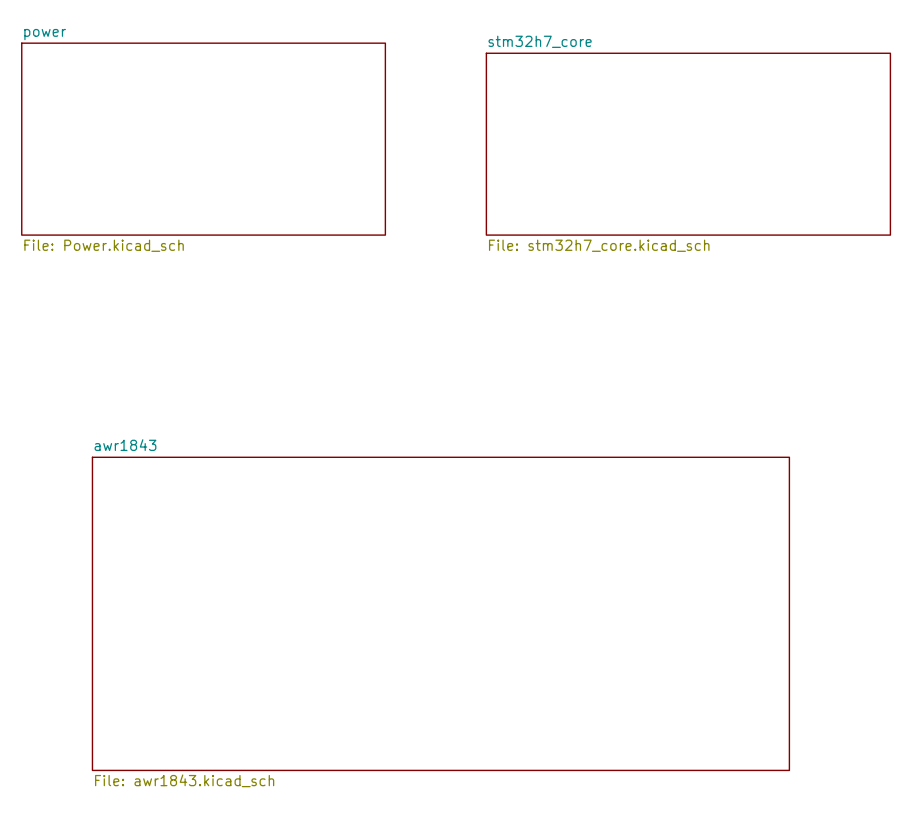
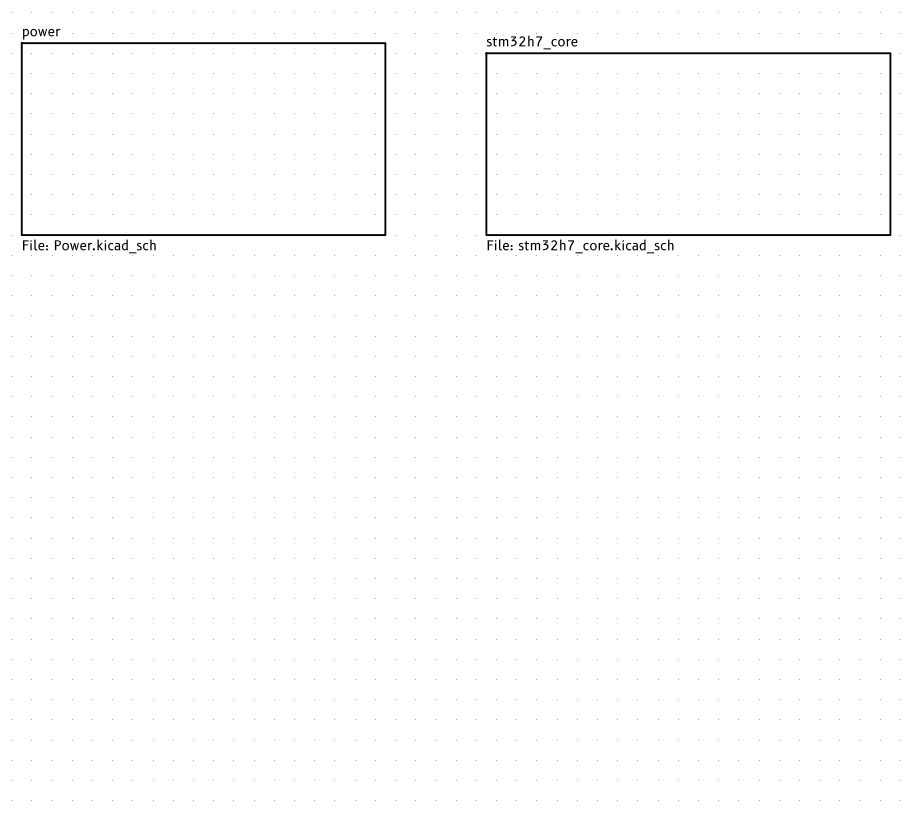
sheet awr1843: File: awr1843.kicad_sch (440, 613) -> none

